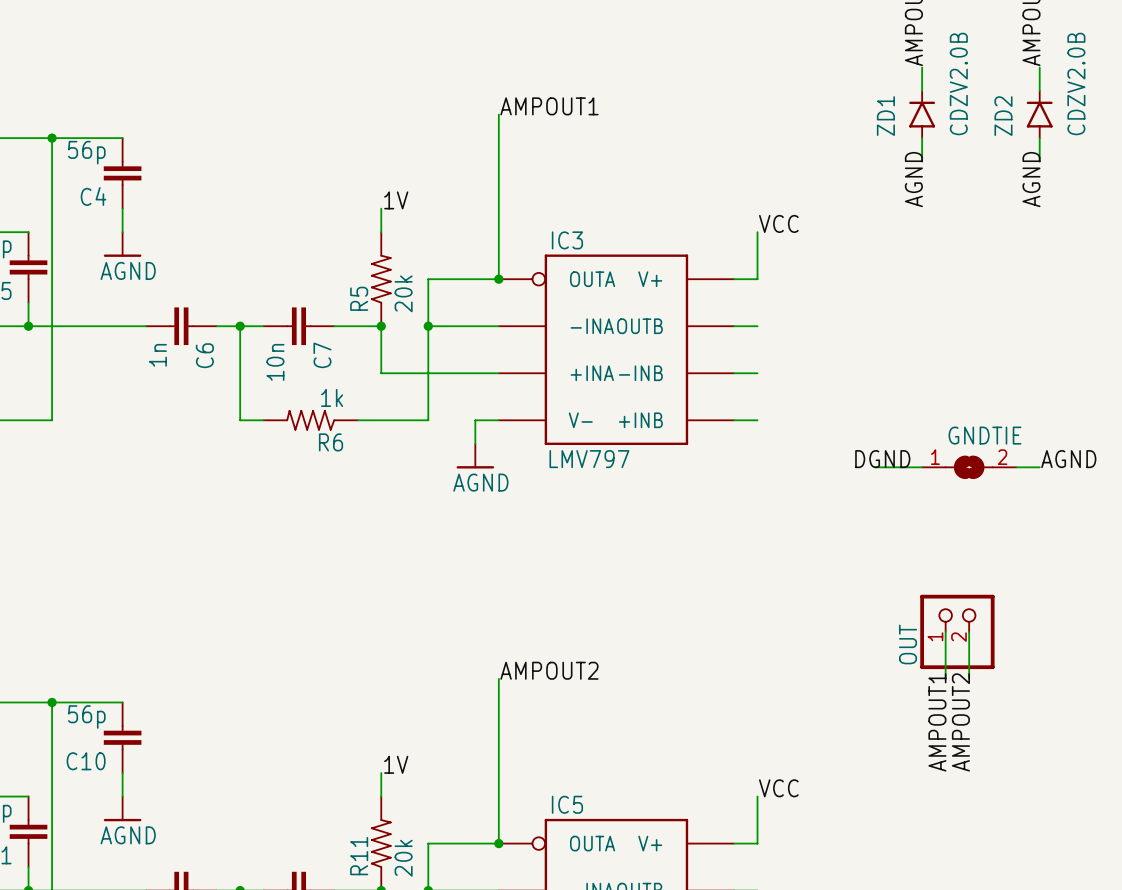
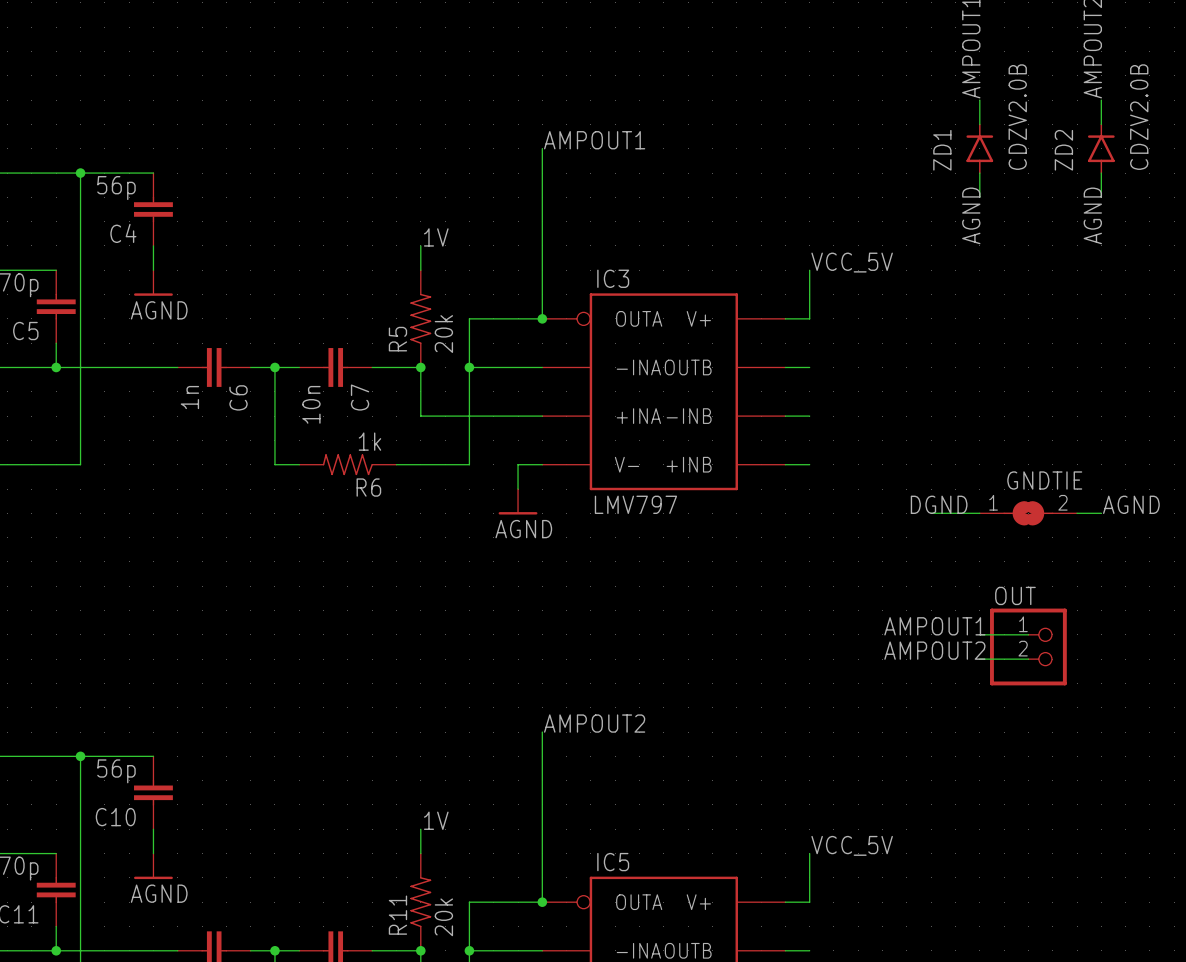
label: VCC (778, 223) -> VCC_5V (852, 262)
wire: none -> (979, 634) (1028, 634)
wire: none -> (979, 659) (1028, 659)
wire: (945, 631) (945, 678) -> none
OUT rotation: 0° (957, 631) -> 90° clockwise (1028, 646)
wire: (969, 631) (969, 678) -> none
label rotation: 0° (937, 722) -> 90° clockwise (934, 626)
label position: AMPOUT1 (937, 722) -> AMPOUT1 (934, 626)
label rotation: 0° (960, 722) -> 90° clockwise (934, 650)
label position: AMPOUT2 (960, 722) -> AMPOUT2 (934, 650)
label: VCC (778, 788) -> VCC_5V (852, 845)

